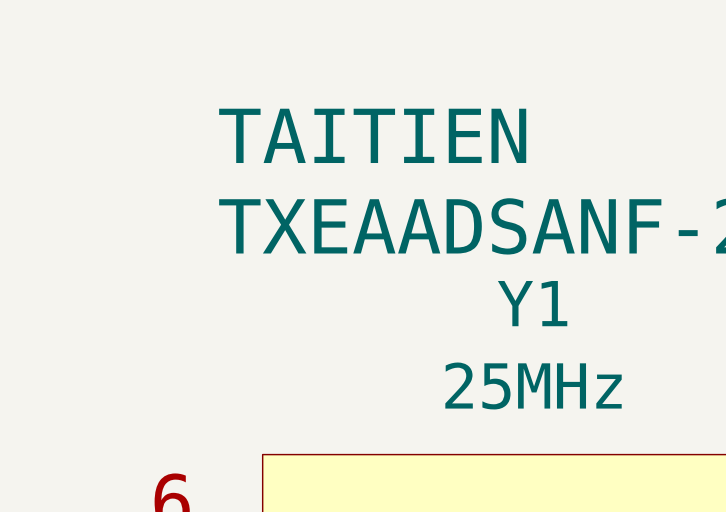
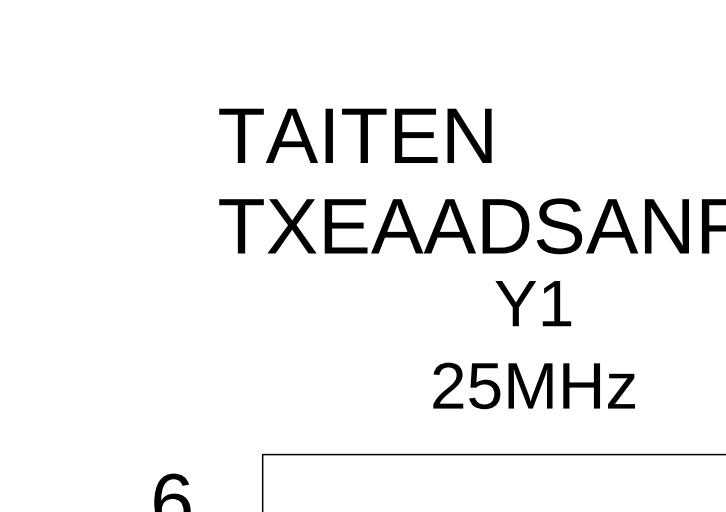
Y1 text: TAITIEN (372, 135) -> TAITEN (355, 135)

